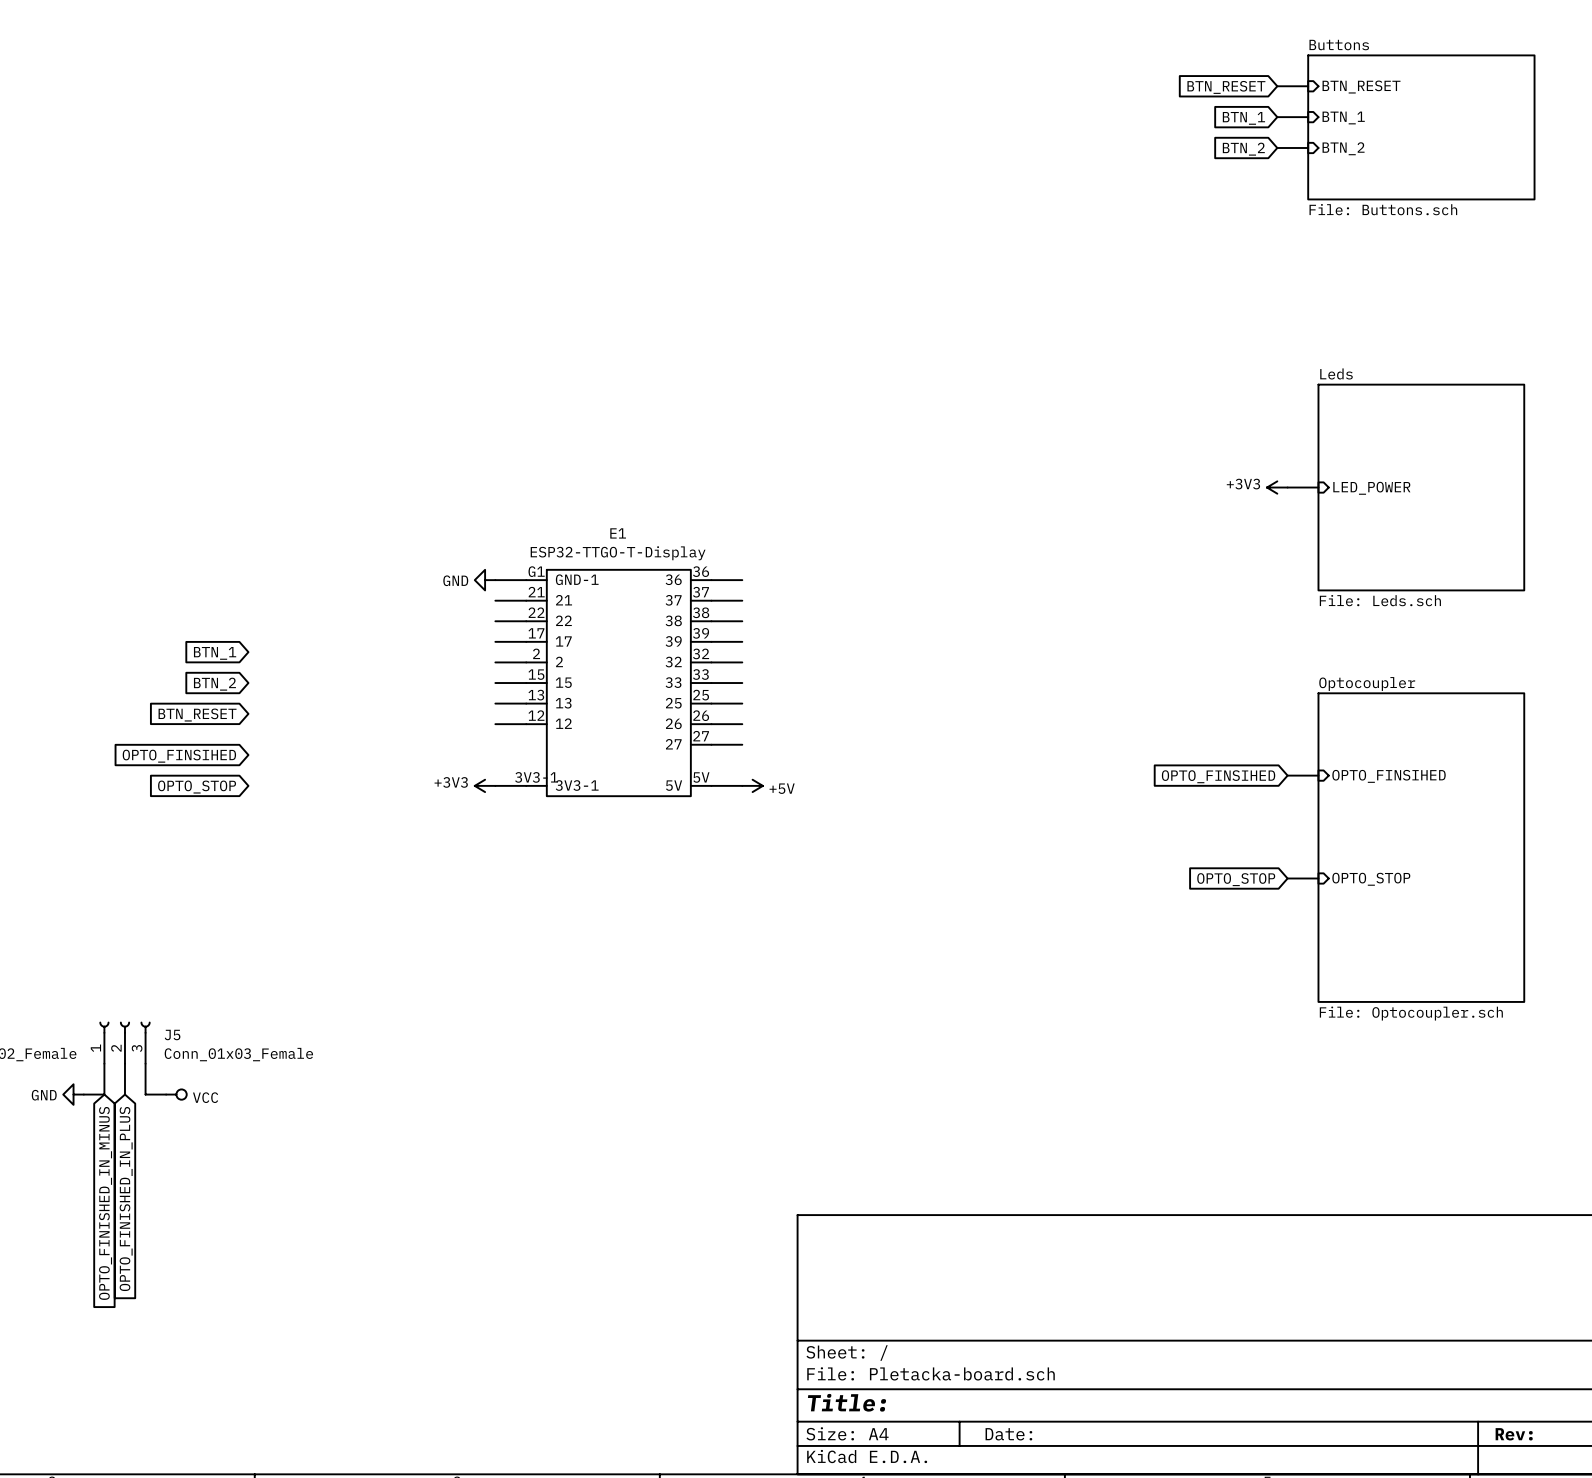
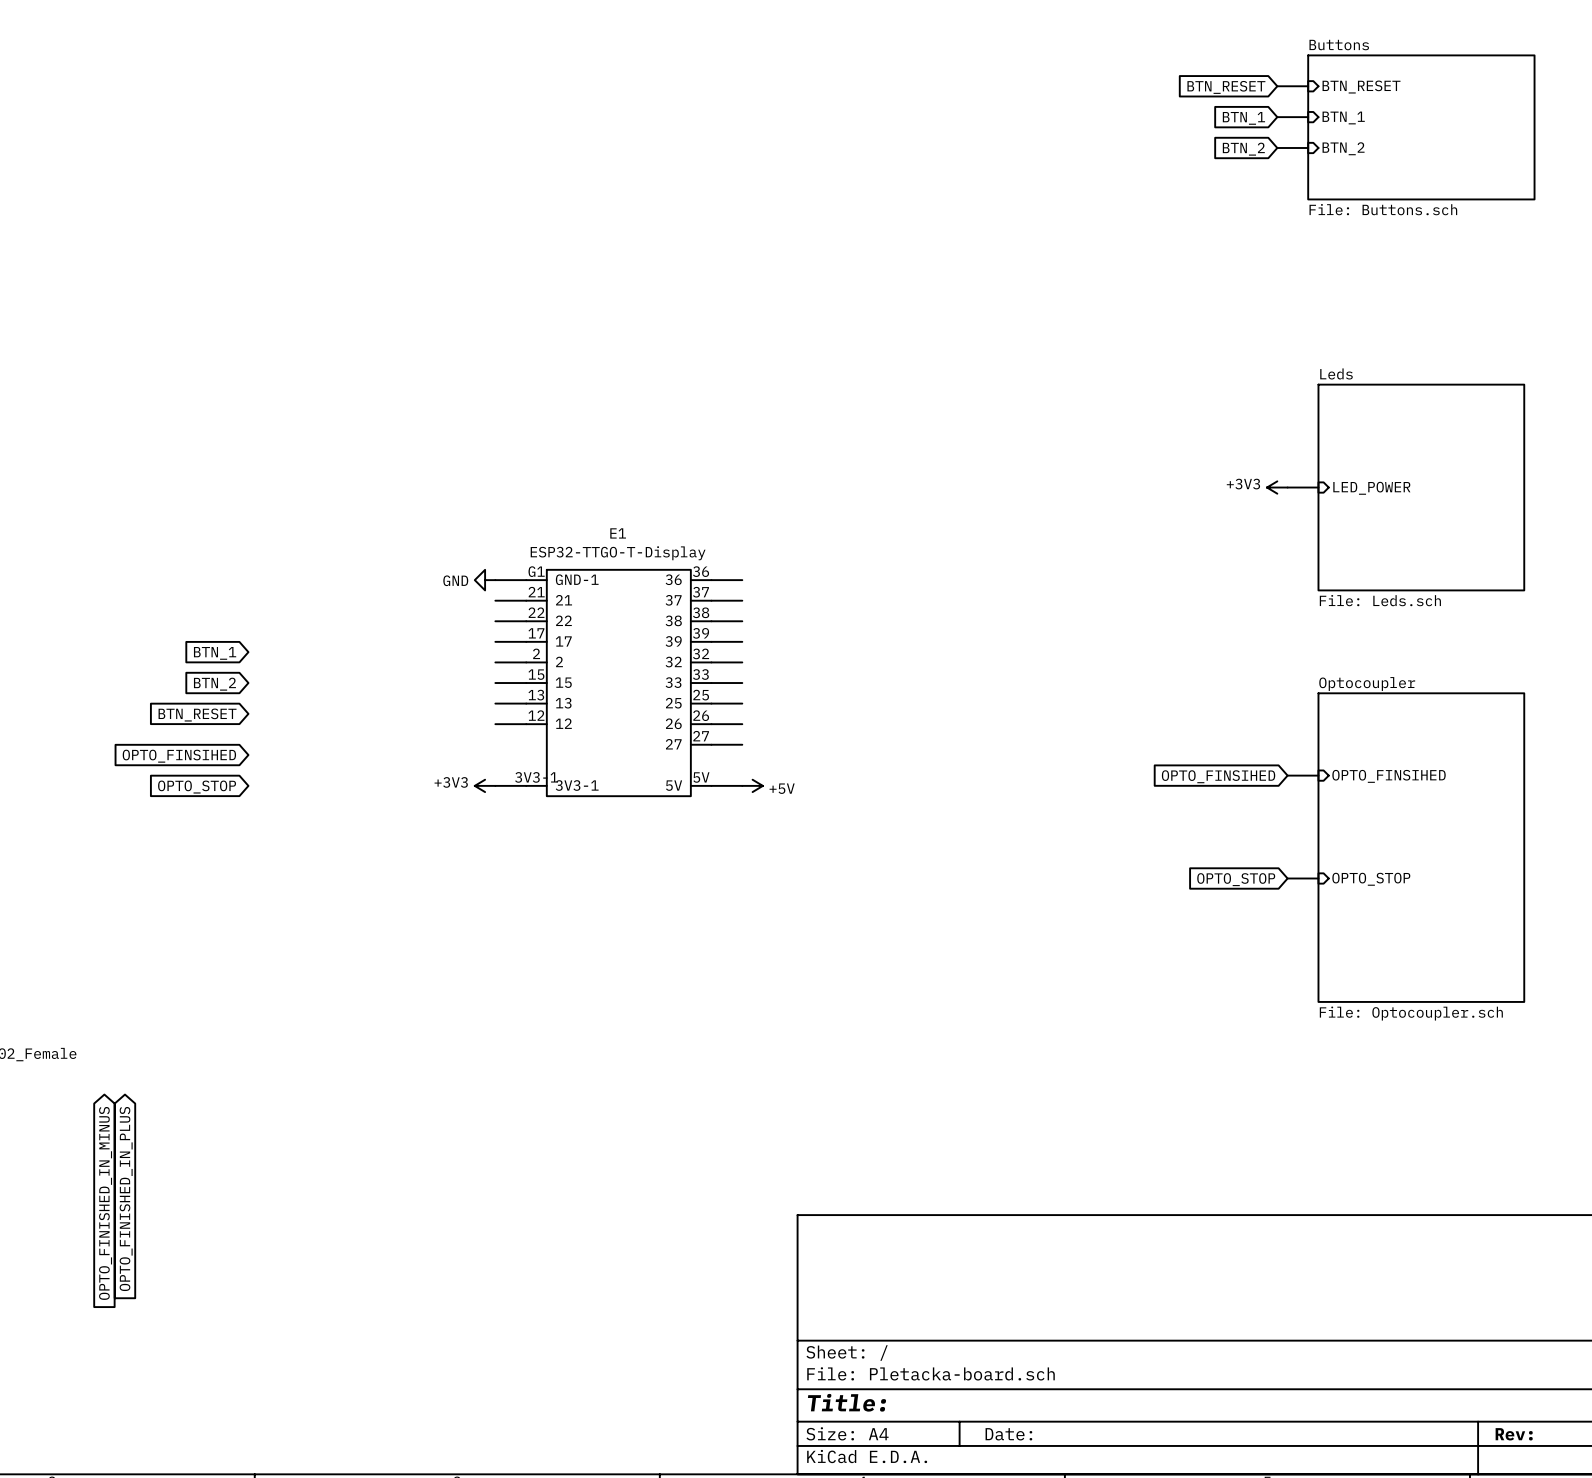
J5: Conn_01x03_Female (124, 1042) -> none
wire: (104, 1063) (104, 1094) (83, 1094) -> none
wire: (124, 1063) (124, 1094) -> none
wire: (145, 1063) (145, 1094) (166, 1094) -> none
power symbol: GND (73, 1094) -> none
power symbol: VCC (176, 1094) -> none

